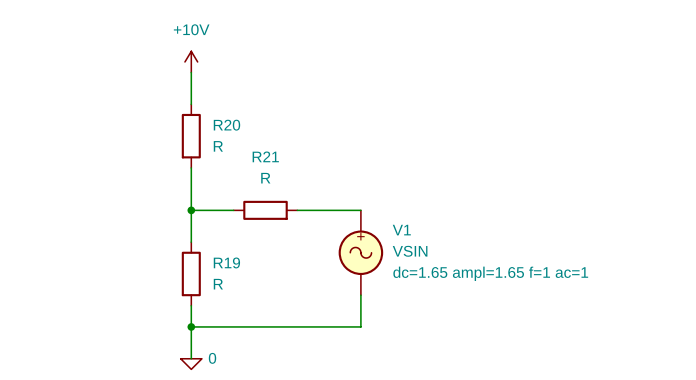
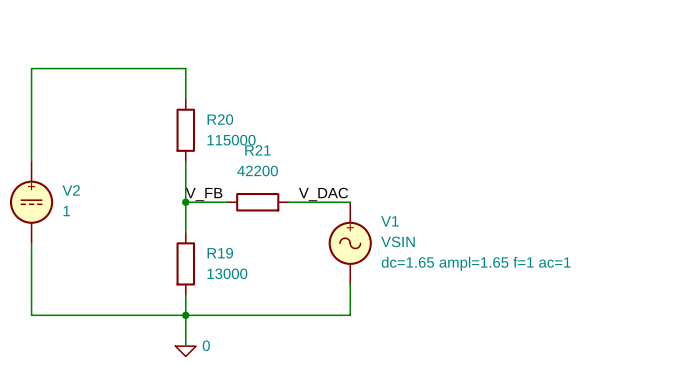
power symbol: +10V (191, 61) -> none
wire: none -> (185, 68) (31, 68) (31, 161)
R20 value: R (218, 146) -> 115000 (231, 140)
R21 value: R (265, 178) -> 42200 (257, 171)
label: none -> V_FB (204, 194)
label: none -> V_DAC (323, 194)
V2: none -> 1 (31, 202)
wire: none -> (31, 243) (31, 315) (185, 315)
R19 value: R (218, 284) -> 13000 (227, 273)

